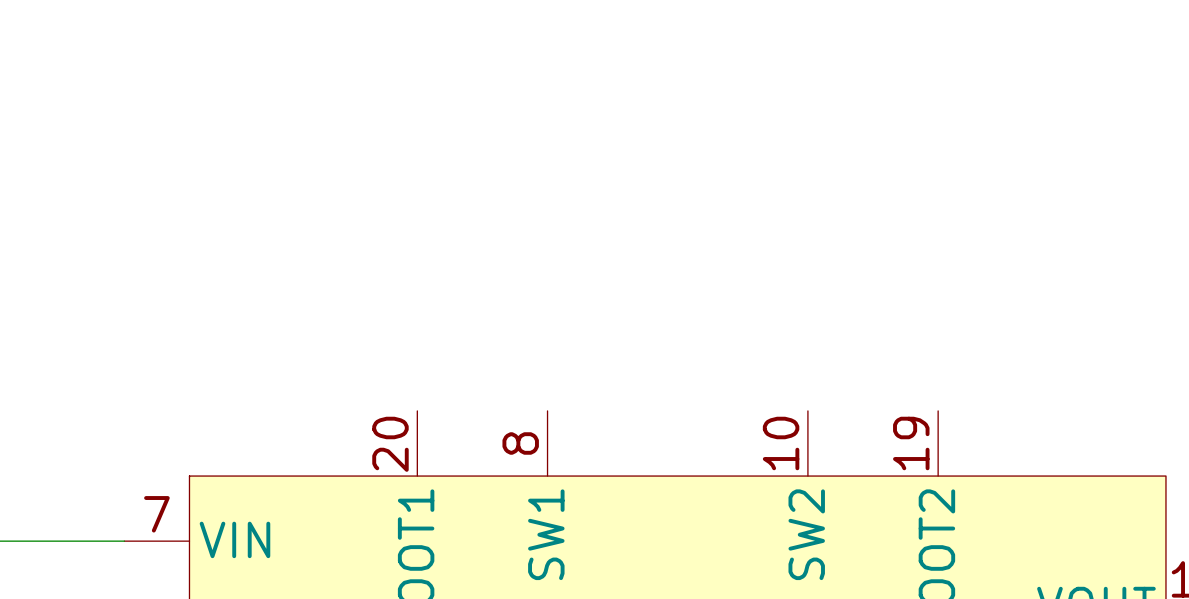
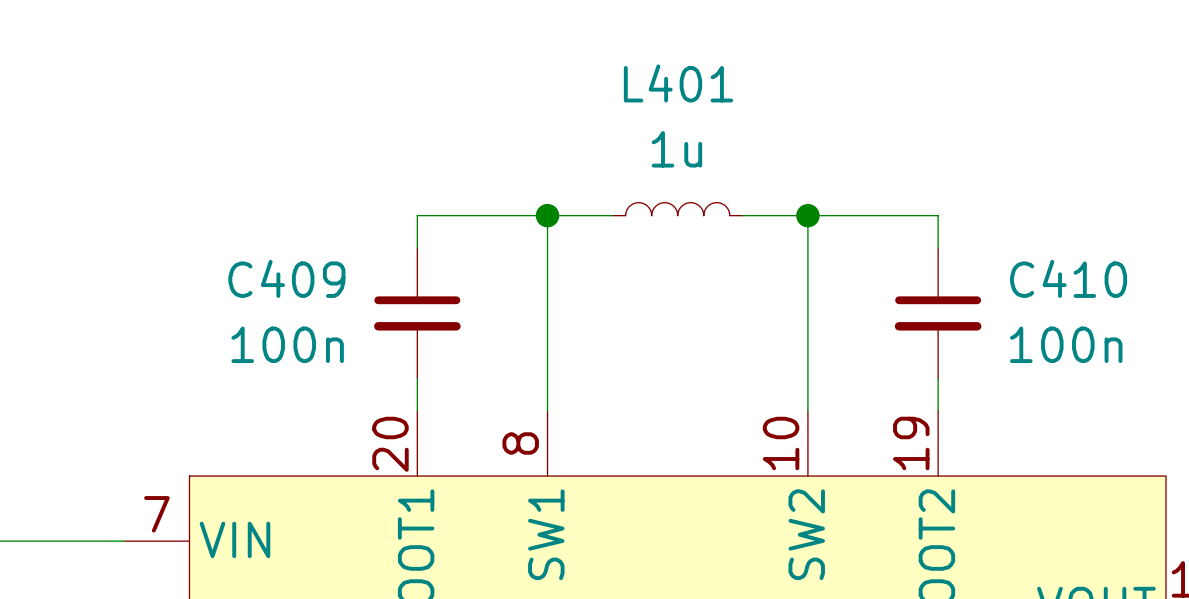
L401: none -> 1u (677, 209)
wire: none -> (547, 215) (547, 410)
junction: none -> (547, 215)
wire: none -> (612, 215) (417, 215) (417, 248)
wire: none -> (742, 215) (938, 215) (938, 248)
wire: none -> (807, 215) (807, 410)
junction: none -> (807, 215)
C409: none -> 100n (417, 313)
C410: none -> 100n (938, 313)
wire: none -> (417, 378) (417, 410)
wire: none -> (938, 378) (938, 410)

